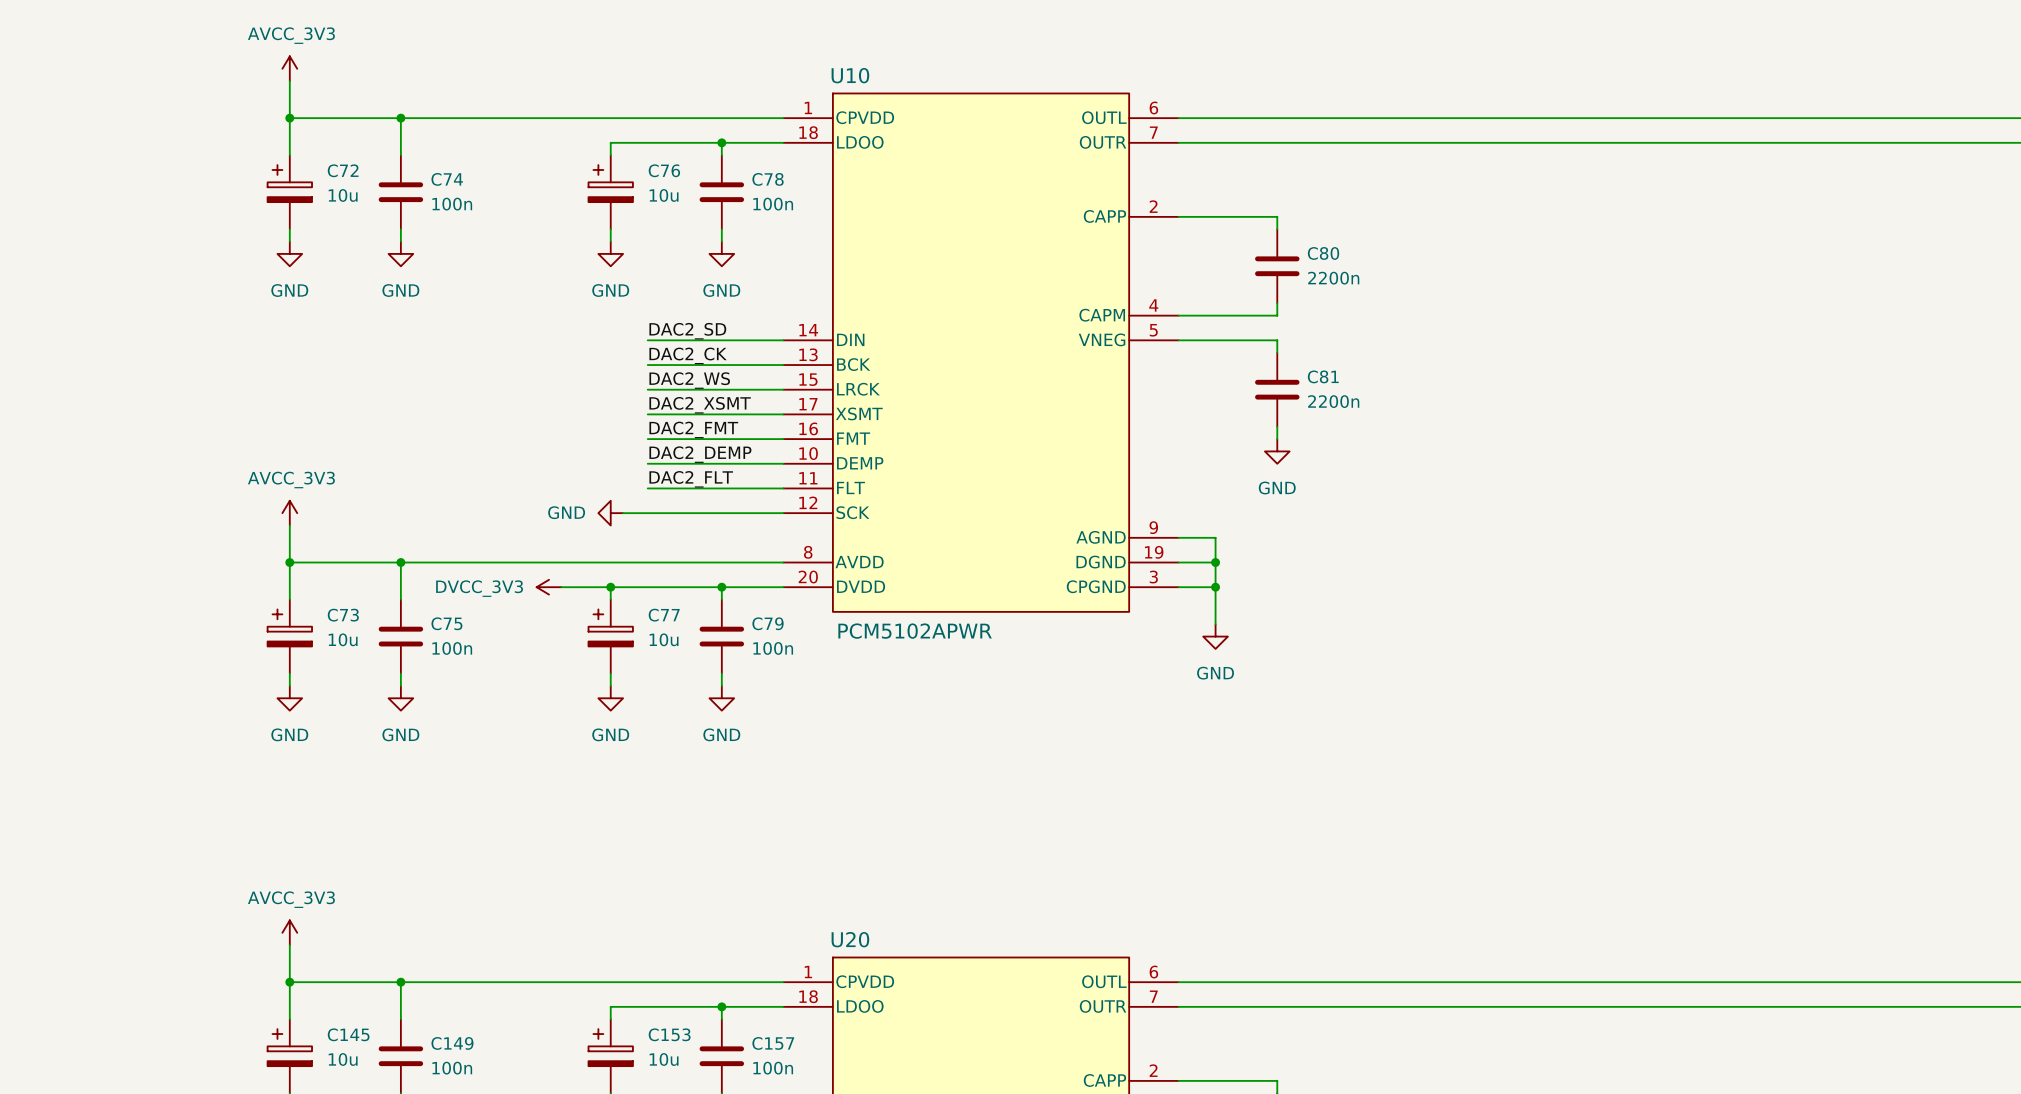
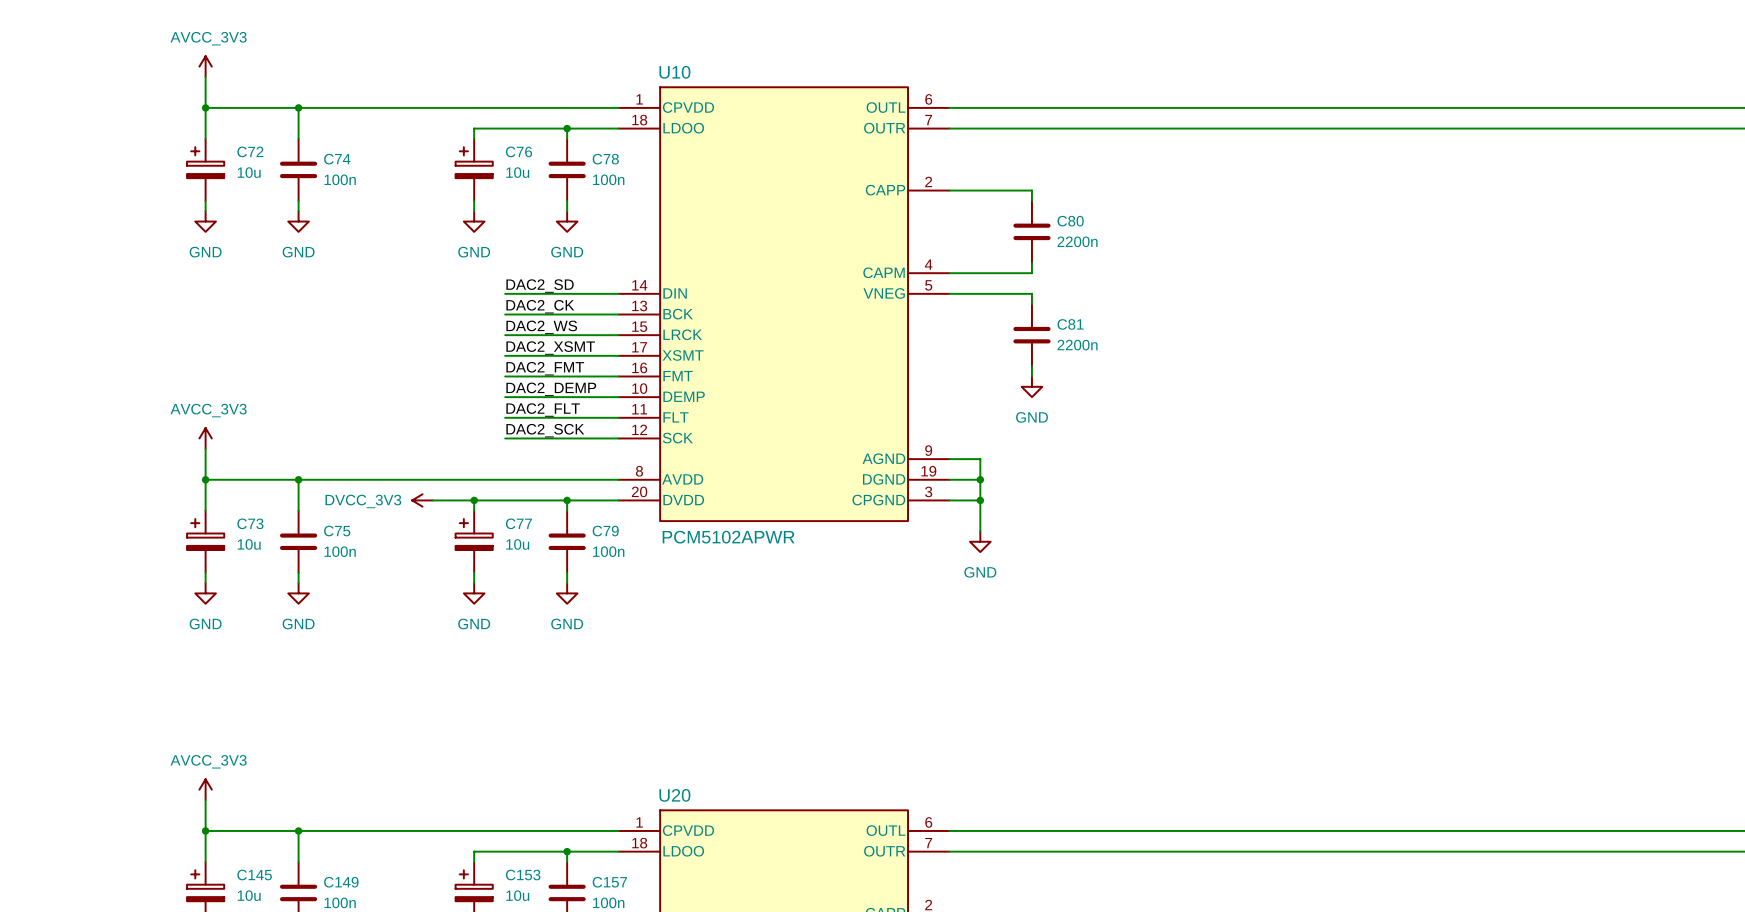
label: none -> DAC2_SCK (545, 430)
power symbol: GND (610, 513) -> none
wire: (623, 513) (647, 513) -> none

